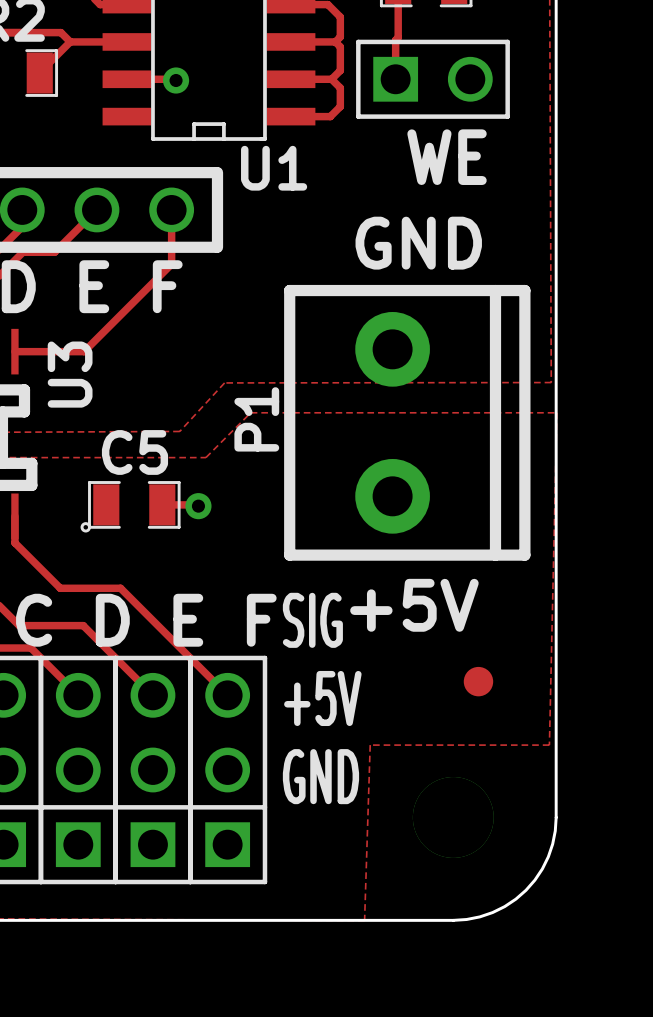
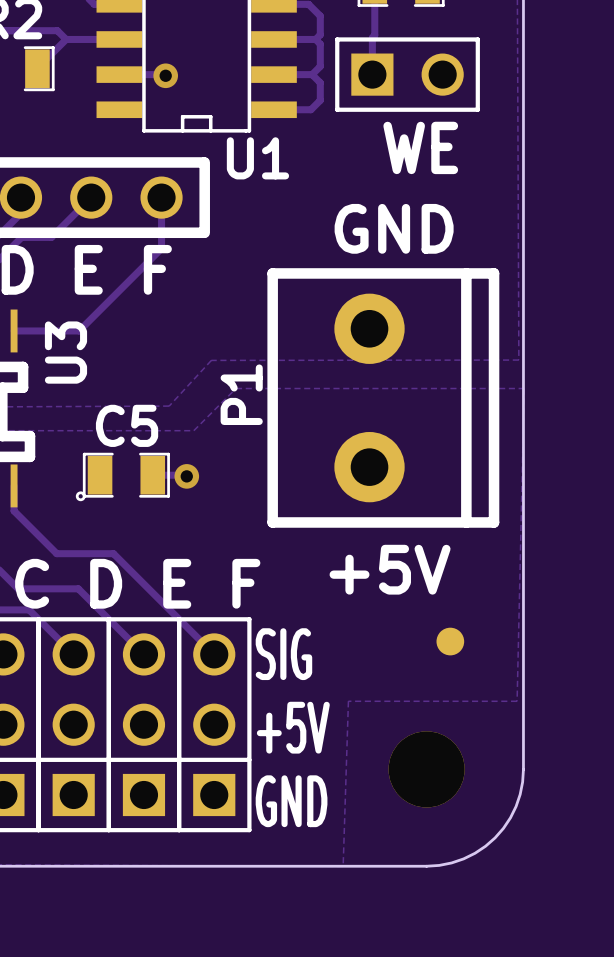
text position: SIG (312, 620) -> SIG (283, 654)
text position: +5V (322, 698) -> +5V (293, 727)
text position: GND (320, 776) -> GND (291, 801)

